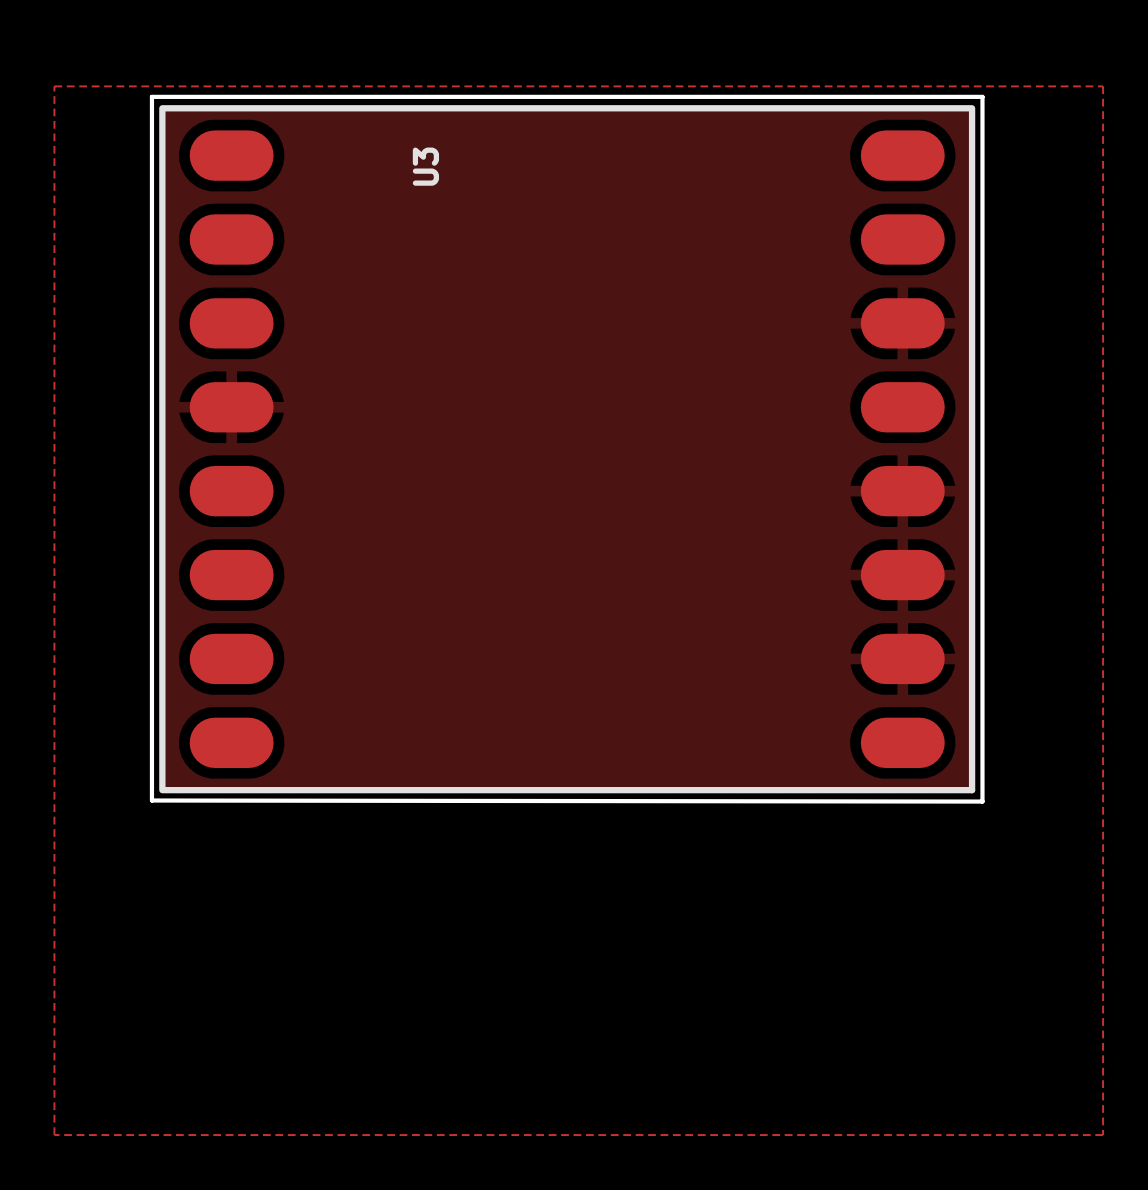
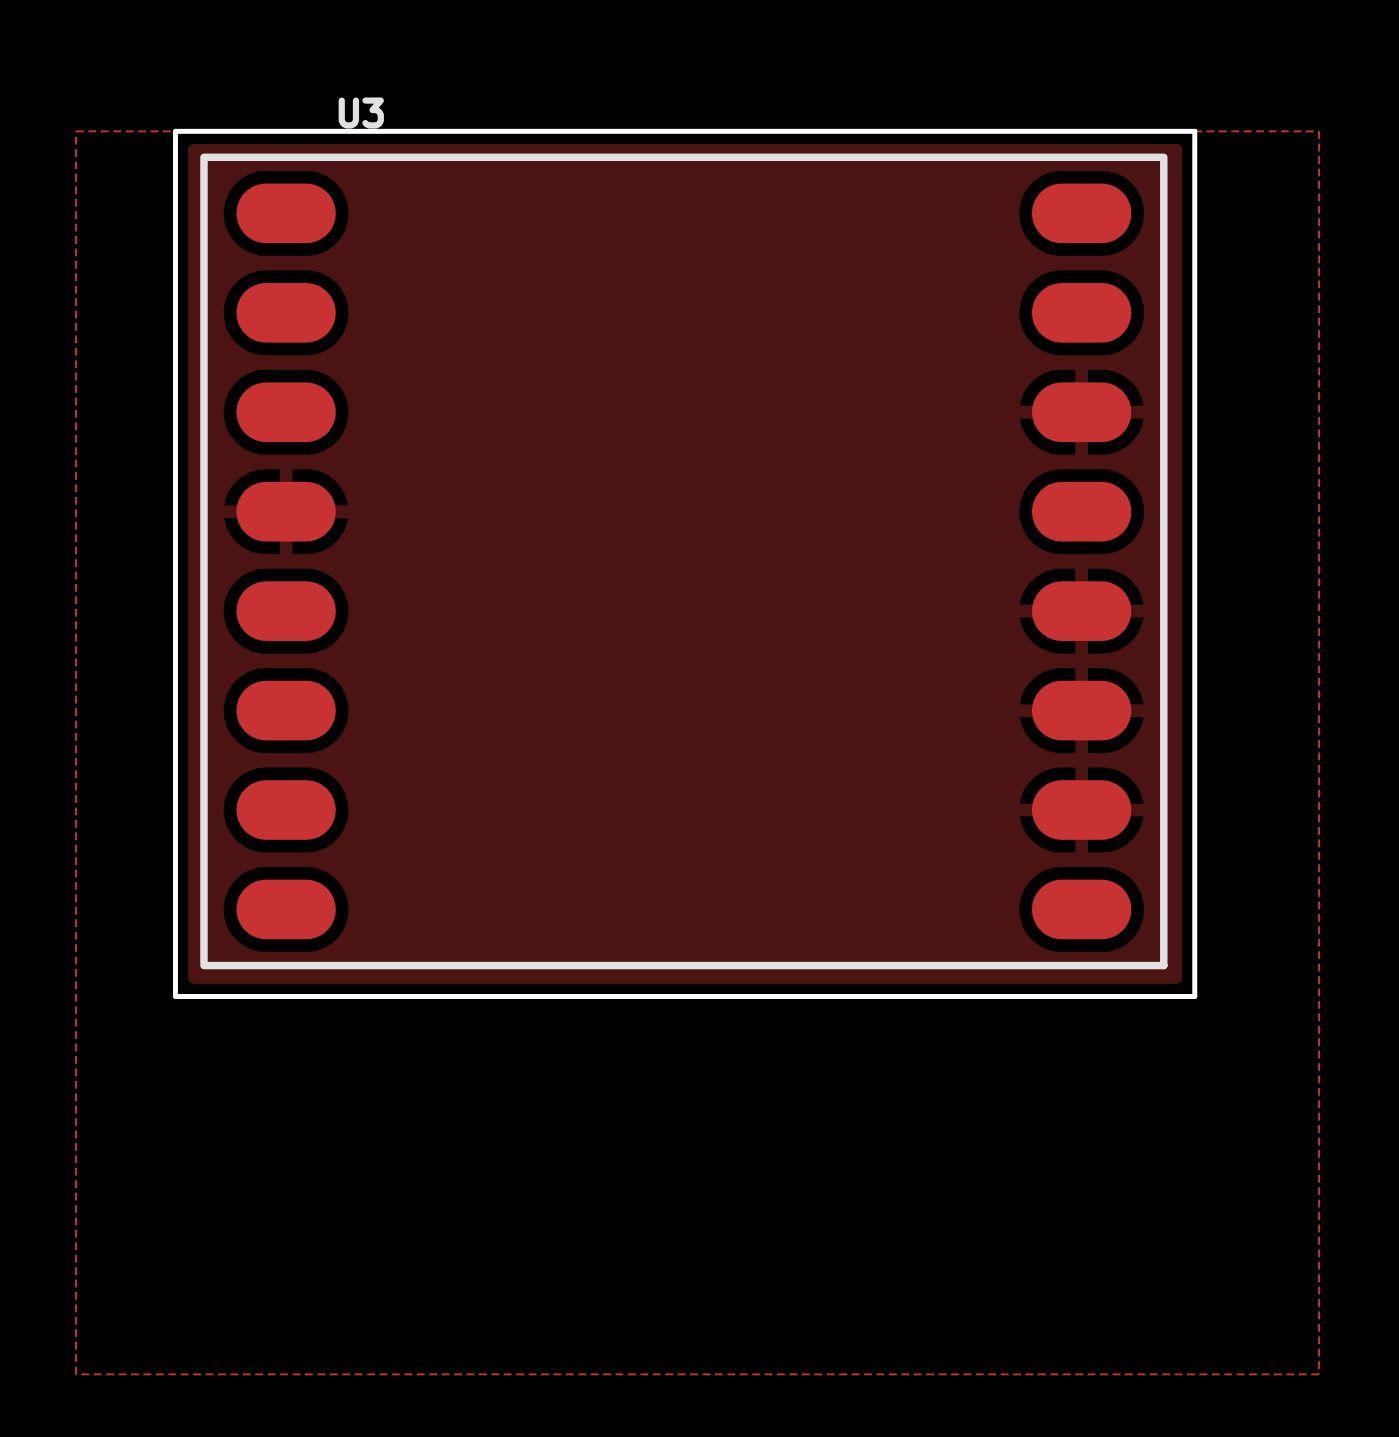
board edge: (151, 96) (982, 96) (982, 801) (151, 800) (151, 96) -> (175, 131) (175, 996) (1194, 996) (1194, 131) (175, 131)
U3 name rotation: 0° (425, 166) -> 90° clockwise (361, 113)
U3 name position: U3 (425, 166) -> U3 (361, 113)

